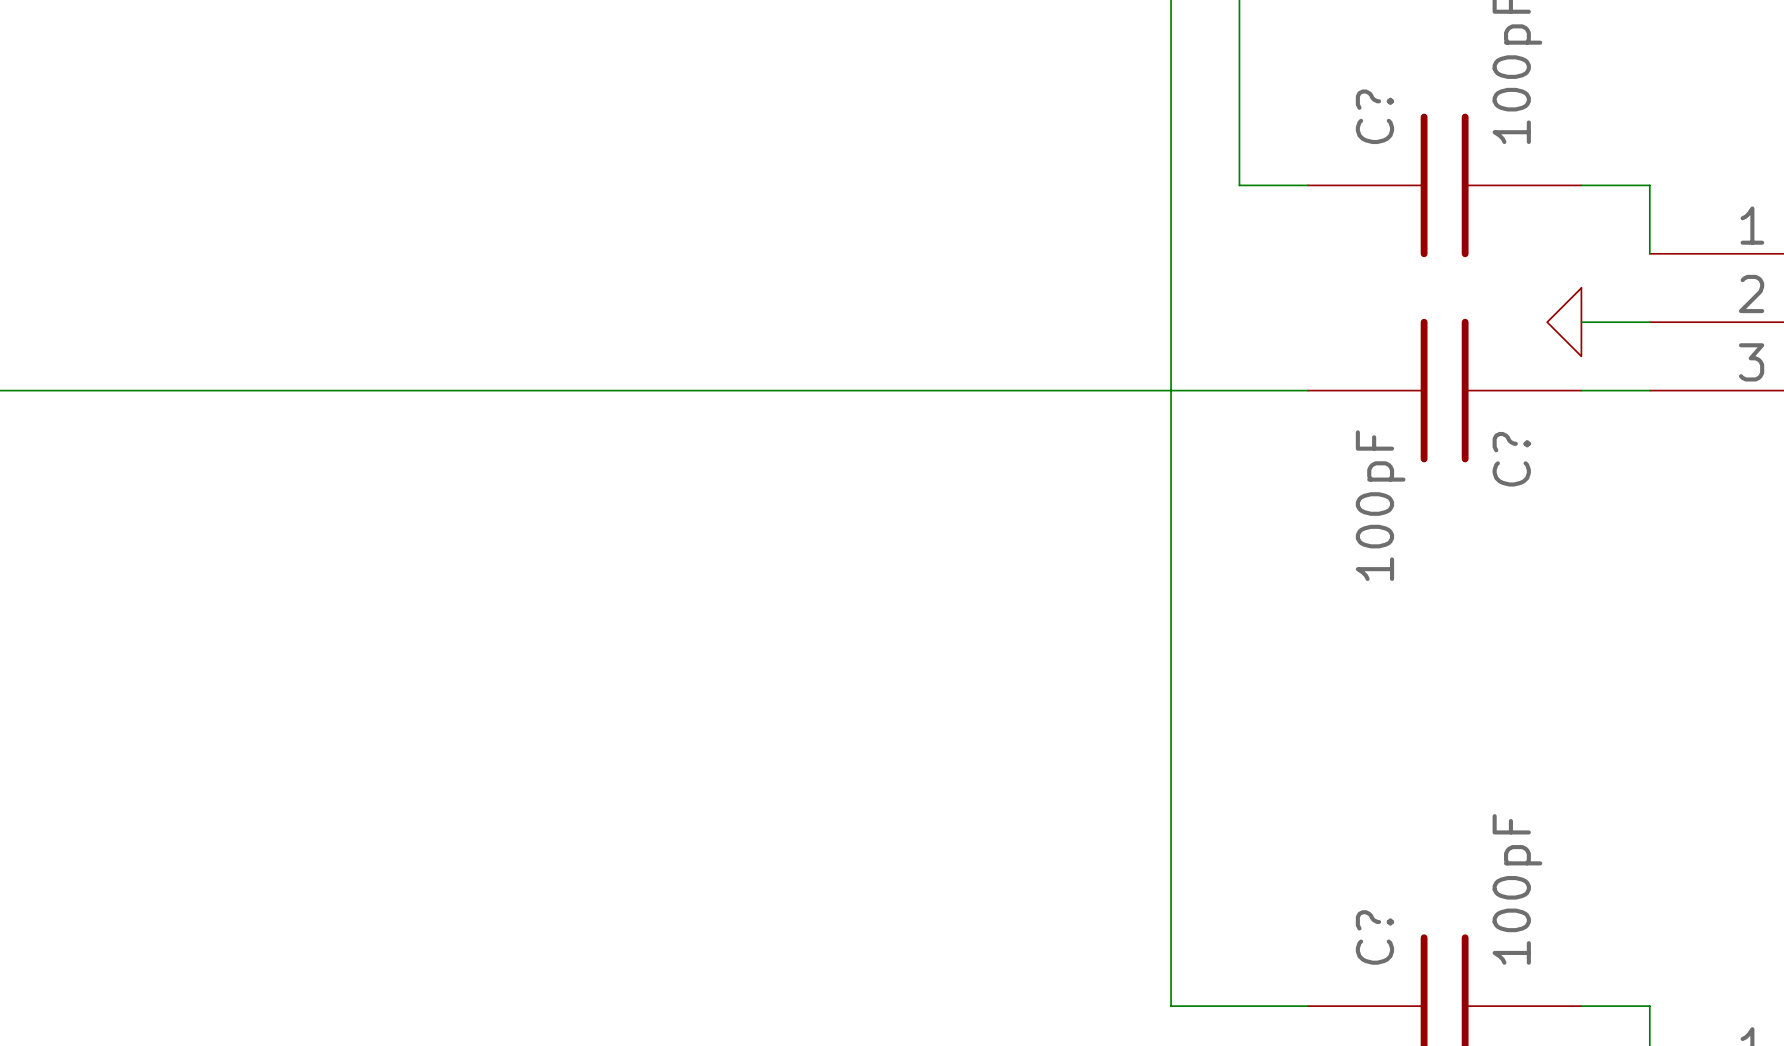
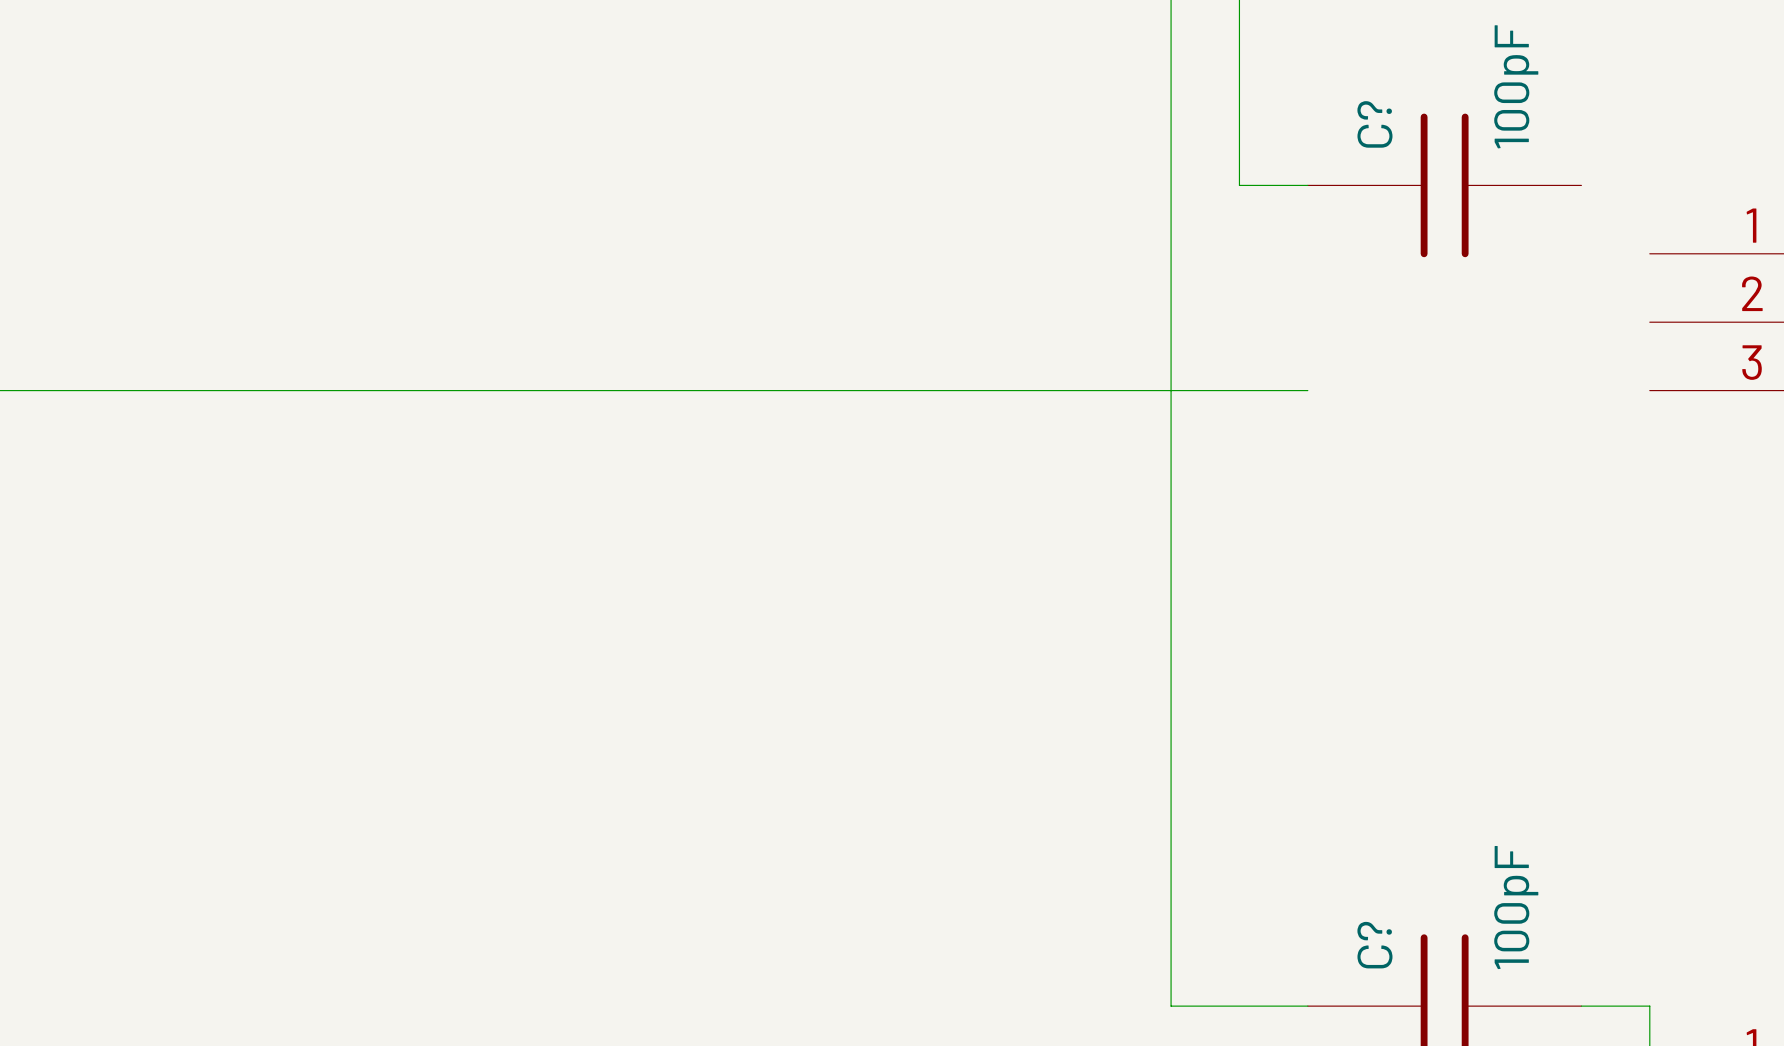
wire: (1581, 185) (1649, 185) (1649, 253) -> none
power symbol: (1564, 322) -> none
wire: (1581, 322) (1649, 322) -> none
C?: 100pF (1444, 390) -> none
wire: (1581, 390) (1649, 390) -> none

